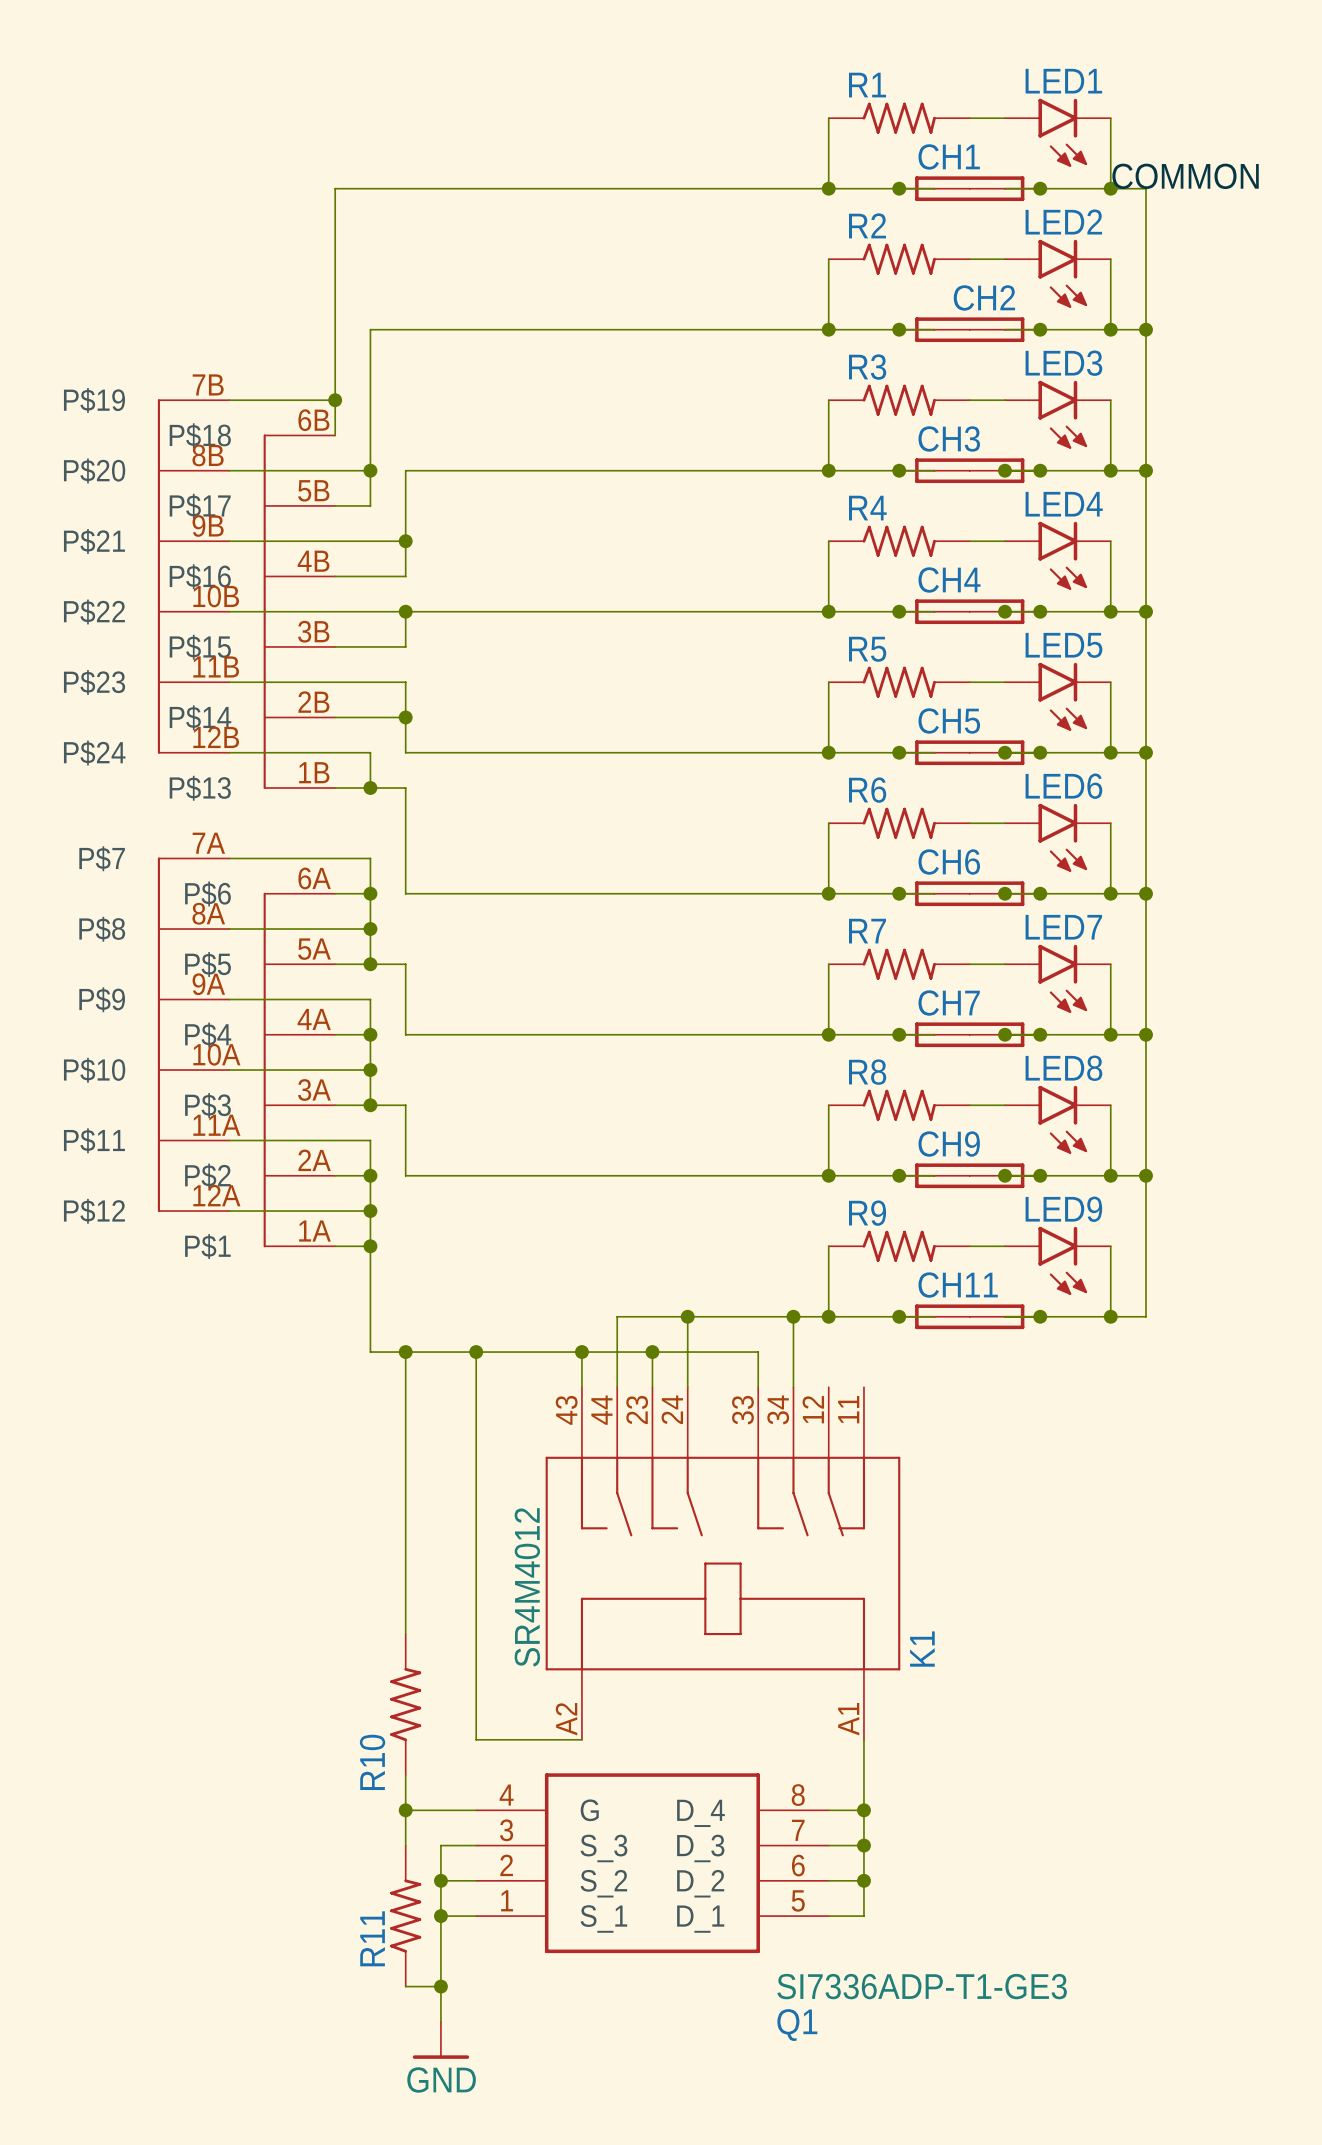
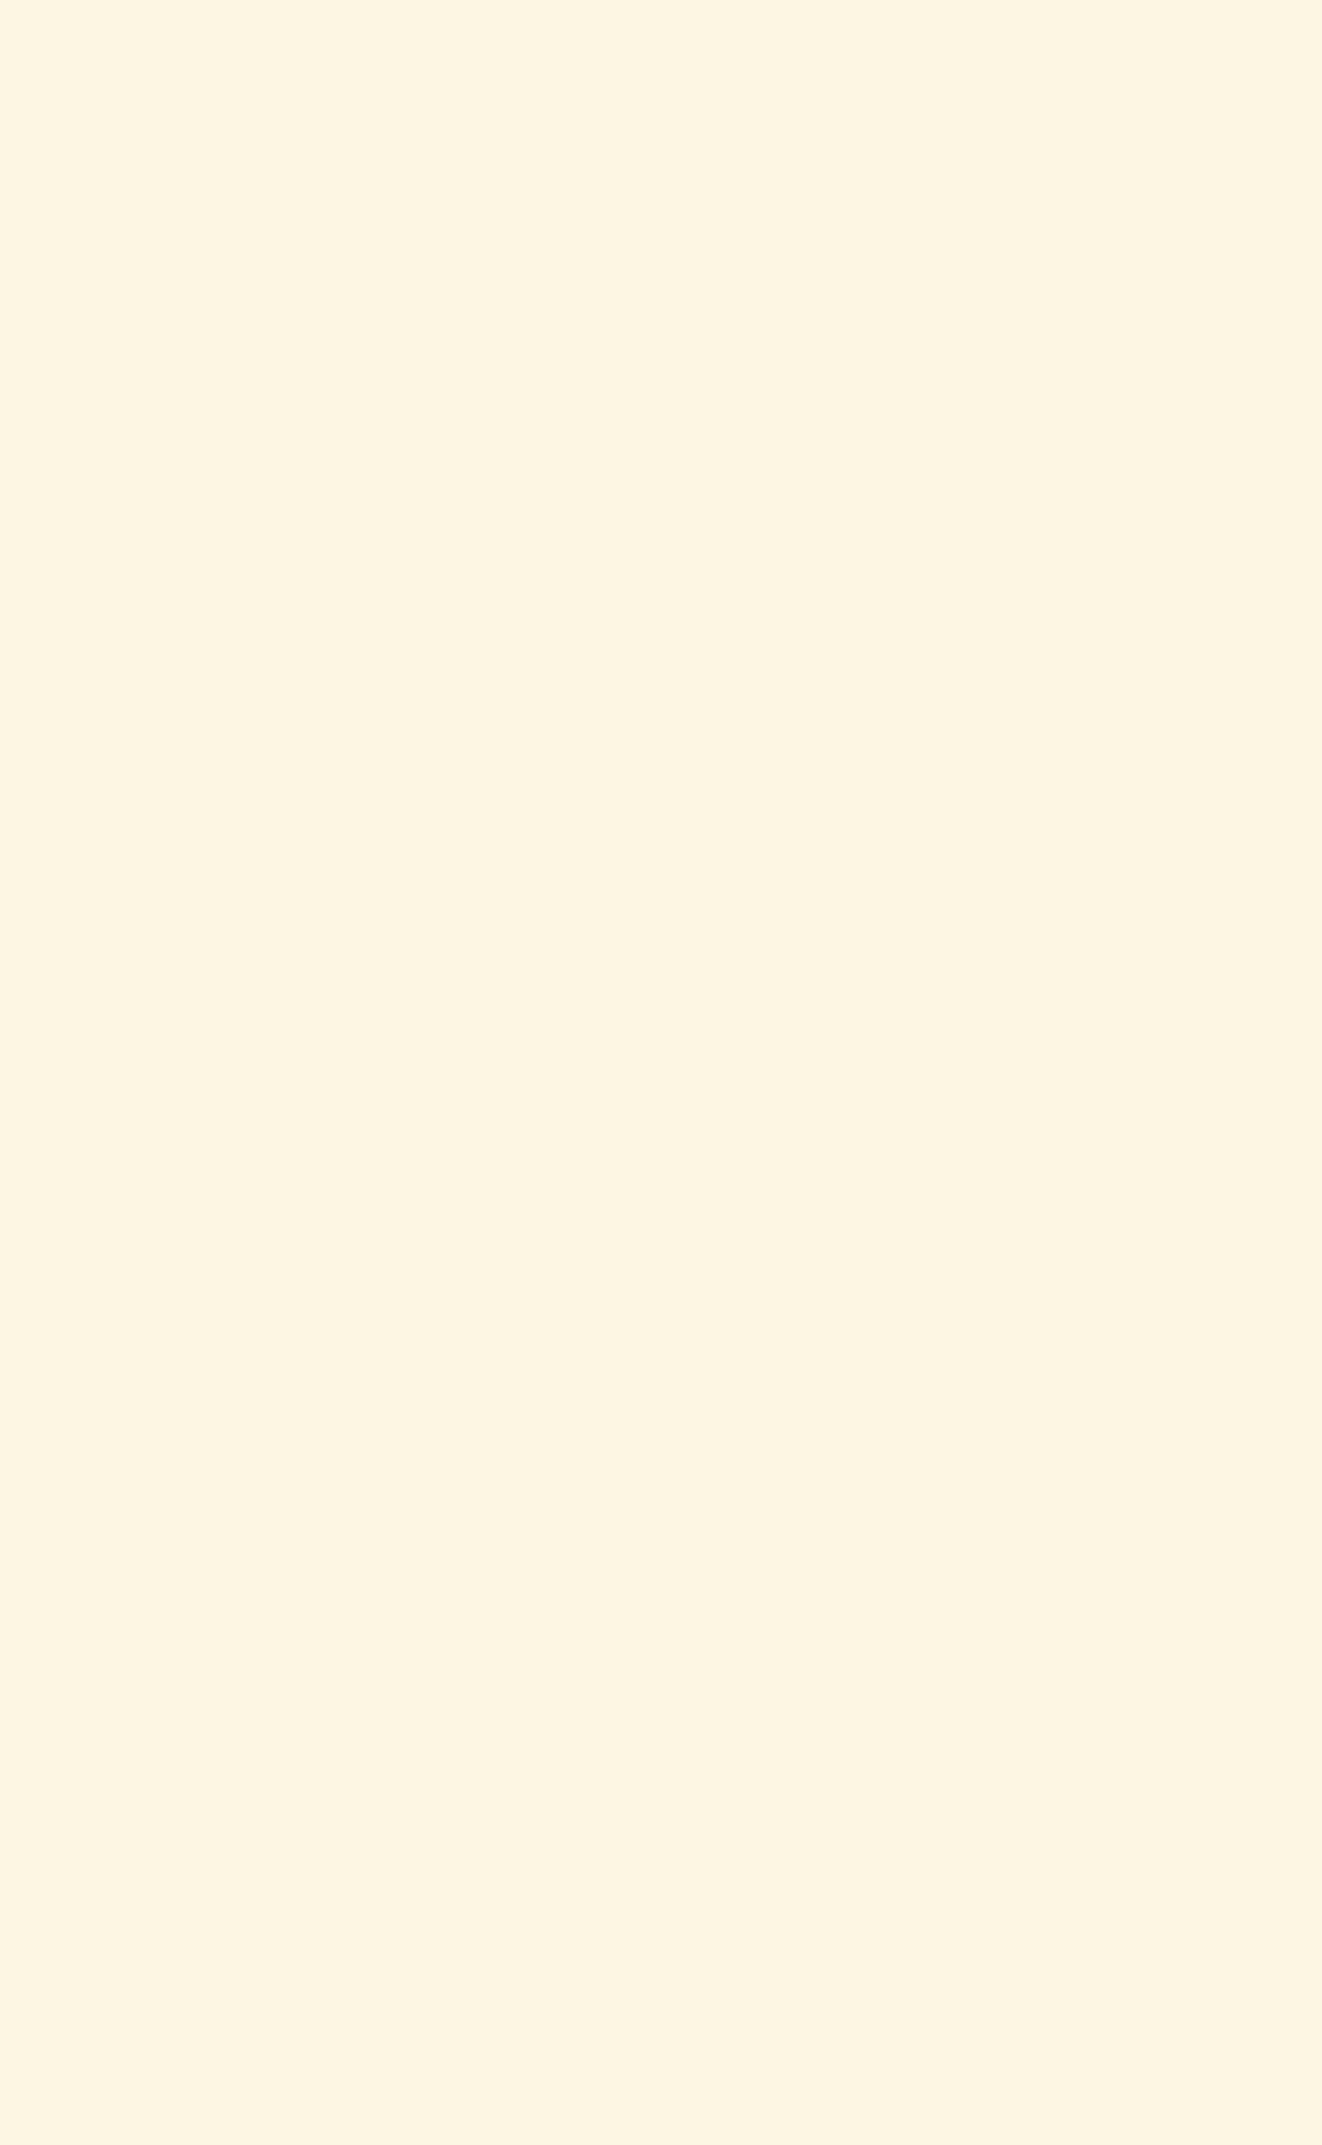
wire: (828, 118) (828, 188) -> none
R1: (899, 118) -> none
wire: (969, 118) (1004, 118) -> none
wire: (1110, 118) (1110, 188) -> none
LED1: (1057, 132) -> none
label: COMMON (1185, 176) -> none
junction: (828, 188) -> none
junction: (899, 188) -> none
wire: (934, 188) (335, 188) (335, 435) -> none
CH1: (969, 188) -> none
wire: (1004, 188) (1146, 188) (1146, 1316) (1004, 1316) -> none
junction: (1040, 188) -> none
junction: (1110, 188) -> none
wire: (828, 259) (828, 329) -> none
R2: (899, 259) -> none
wire: (969, 259) (1004, 259) -> none
wire: (1110, 259) (1110, 329) -> none
LED2: (1057, 273) -> none
junction: (828, 329) -> none
junction: (899, 329) -> none
wire: (934, 329) (370, 329) (370, 505) (335, 505) -> none
CH2: (969, 329) -> none
wire: (1004, 329) (1146, 329) -> none
junction: (1040, 329) -> none
junction: (1110, 329) -> none
junction: (1146, 329) -> none
wire: (229, 400) (335, 400) -> none
junction: (335, 400) -> none
wire: (828, 400) (828, 470) -> none
R3: (899, 400) -> none
wire: (969, 400) (1004, 400) -> none
wire: (1110, 400) (1110, 470) -> none
LED3: (1057, 414) -> none
wire: (229, 470) (370, 470) -> none
junction: (370, 470) -> none
junction: (828, 470) -> none
junction: (899, 470) -> none
wire: (934, 470) (405, 470) (405, 576) (335, 576) -> none
CH3: (969, 470) -> none
wire: (1004, 470) (1146, 470) -> none
junction: (1004, 470) -> none
junction: (1040, 470) -> none
junction: (1110, 470) -> none
junction: (1146, 470) -> none
wire: (229, 541) (405, 541) -> none
junction: (405, 541) -> none
wire: (828, 541) (828, 611) -> none
R4: (899, 541) -> none
wire: (969, 541) (1004, 541) -> none
wire: (1110, 541) (1110, 611) -> none
LED4: (1057, 555) -> none
wire: (229, 611) (934, 611) -> none
wire: (405, 611) (405, 646) (335, 646) -> none
junction: (405, 611) -> none
junction: (828, 611) -> none
junction: (899, 611) -> none
CH4: (969, 611) -> none
wire: (1004, 611) (1146, 611) -> none
junction: (1004, 611) -> none
junction: (1040, 611) -> none
junction: (1110, 611) -> none
junction: (1146, 611) -> none
wire: (229, 682) (405, 682) (405, 752) (934, 752) -> none
wire: (828, 682) (828, 752) -> none
R5: (899, 682) -> none
wire: (969, 682) (1004, 682) -> none
wire: (1110, 682) (1110, 752) -> none
LED5: (1057, 696) -> none
wire: (335, 717) (405, 717) -> none
junction: (405, 717) -> none
wire: (229, 752) (370, 752) (370, 787) -> none
junction: (828, 752) -> none
junction: (899, 752) -> none
CH5: (969, 752) -> none
wire: (1004, 752) (1146, 752) -> none
junction: (1004, 752) -> none
junction: (1040, 752) -> none
junction: (1110, 752) -> none
junction: (1146, 752) -> none
wire: (335, 787) (405, 787) (405, 893) (934, 893) -> none
junction: (370, 787) -> none
part: (246, 823) -> none
wire: (828, 823) (828, 893) -> none
R6: (899, 823) -> none
wire: (969, 823) (1004, 823) -> none
wire: (1110, 823) (1110, 893) -> none
LED6: (1057, 837) -> none
wire: (229, 858) (370, 858) (370, 964) -> none
wire: (335, 893) (370, 893) -> none
junction: (370, 893) -> none
junction: (828, 893) -> none
junction: (899, 893) -> none
CH6: (969, 893) -> none
wire: (1004, 893) (1146, 893) -> none
junction: (1004, 893) -> none
junction: (1040, 893) -> none
junction: (1110, 893) -> none
junction: (1146, 893) -> none
wire: (229, 929) (370, 929) -> none
junction: (370, 929) -> none
wire: (335, 964) (405, 964) (405, 1034) (934, 1034) -> none
junction: (370, 964) -> none
wire: (828, 964) (828, 1034) -> none
R7: (899, 964) -> none
wire: (969, 964) (1004, 964) -> none
wire: (1110, 964) (1110, 1034) -> none
LED7: (1057, 978) -> none
wire: (229, 999) (370, 999) (370, 1105) -> none
wire: (335, 1034) (370, 1034) -> none
junction: (370, 1034) -> none
junction: (828, 1034) -> none
junction: (899, 1034) -> none
CH7: (969, 1034) -> none
wire: (1004, 1034) (1146, 1034) -> none
junction: (1004, 1034) -> none
junction: (1040, 1034) -> none
junction: (1110, 1034) -> none
junction: (1146, 1034) -> none
wire: (229, 1070) (370, 1070) -> none
junction: (370, 1070) -> none
wire: (335, 1105) (405, 1105) (405, 1175) (934, 1175) -> none
junction: (370, 1105) -> none
wire: (828, 1105) (828, 1175) -> none
R8: (899, 1105) -> none
wire: (969, 1105) (1004, 1105) -> none
wire: (1110, 1105) (1110, 1175) -> none
LED8: (1057, 1119) -> none
wire: (229, 1140) (370, 1140) (370, 1352) (758, 1352) (758, 1387) -> none
wire: (335, 1175) (370, 1175) -> none
junction: (370, 1175) -> none
junction: (828, 1175) -> none
junction: (899, 1175) -> none
CH9: (969, 1175) -> none
wire: (1004, 1175) (1146, 1175) -> none
junction: (1004, 1175) -> none
junction: (1040, 1175) -> none
junction: (1110, 1175) -> none
junction: (1146, 1175) -> none
wire: (229, 1211) (370, 1211) -> none
junction: (370, 1211) -> none
wire: (335, 1246) (370, 1246) -> none
junction: (370, 1246) -> none
wire: (828, 1246) (828, 1316) -> none
R9: (899, 1246) -> none
wire: (969, 1246) (1004, 1246) -> none
wire: (1110, 1246) (1110, 1316) -> none
LED9: (1057, 1260) -> none
wire: (687, 1316) (687, 1387) -> none
junction: (687, 1316) -> none
wire: (793, 1316) (793, 1387) -> none
junction: (793, 1316) -> none
junction: (828, 1316) -> none
junction: (899, 1316) -> none
wire: (934, 1316) (617, 1316) (617, 1387) -> none
CH11: (969, 1316) -> none
junction: (1040, 1316) -> none
junction: (1110, 1316) -> none
wire: (405, 1352) (405, 1634) -> none
junction: (405, 1352) -> none
wire: (476, 1352) (476, 1739) (581, 1739) -> none
junction: (476, 1352) -> none
wire: (581, 1352) (581, 1387) -> none
junction: (581, 1352) -> none
wire: (652, 1352) (652, 1387) -> none
junction: (652, 1352) -> none
K1: SR4M4012 (722, 1563) -> none
R10: (405, 1704) -> none
wire: (863, 1739) (863, 1916) (828, 1916) -> none
wire: (405, 1775) (405, 1845) -> none
wire: (405, 1810) (476, 1810) -> none
junction: (405, 1810) -> none
wire: (828, 1810) (863, 1810) -> none
junction: (863, 1810) -> none
wire: (476, 1845) (440, 1845) (440, 2021) -> none
wire: (828, 1845) (863, 1845) -> none
junction: (863, 1845) -> none
Q1: SI7336ADP-T1-GE3 (652, 1863) -> none
wire: (440, 1880) (476, 1880) -> none
junction: (440, 1880) -> none
wire: (828, 1880) (863, 1880) -> none
junction: (863, 1880) -> none
R11: (405, 1916) -> none
wire: (440, 1916) (476, 1916) -> none
junction: (440, 1916) -> none
wire: (405, 1986) (440, 1986) -> none
junction: (440, 1986) -> none
power symbol: GND (440, 2040) -> none

